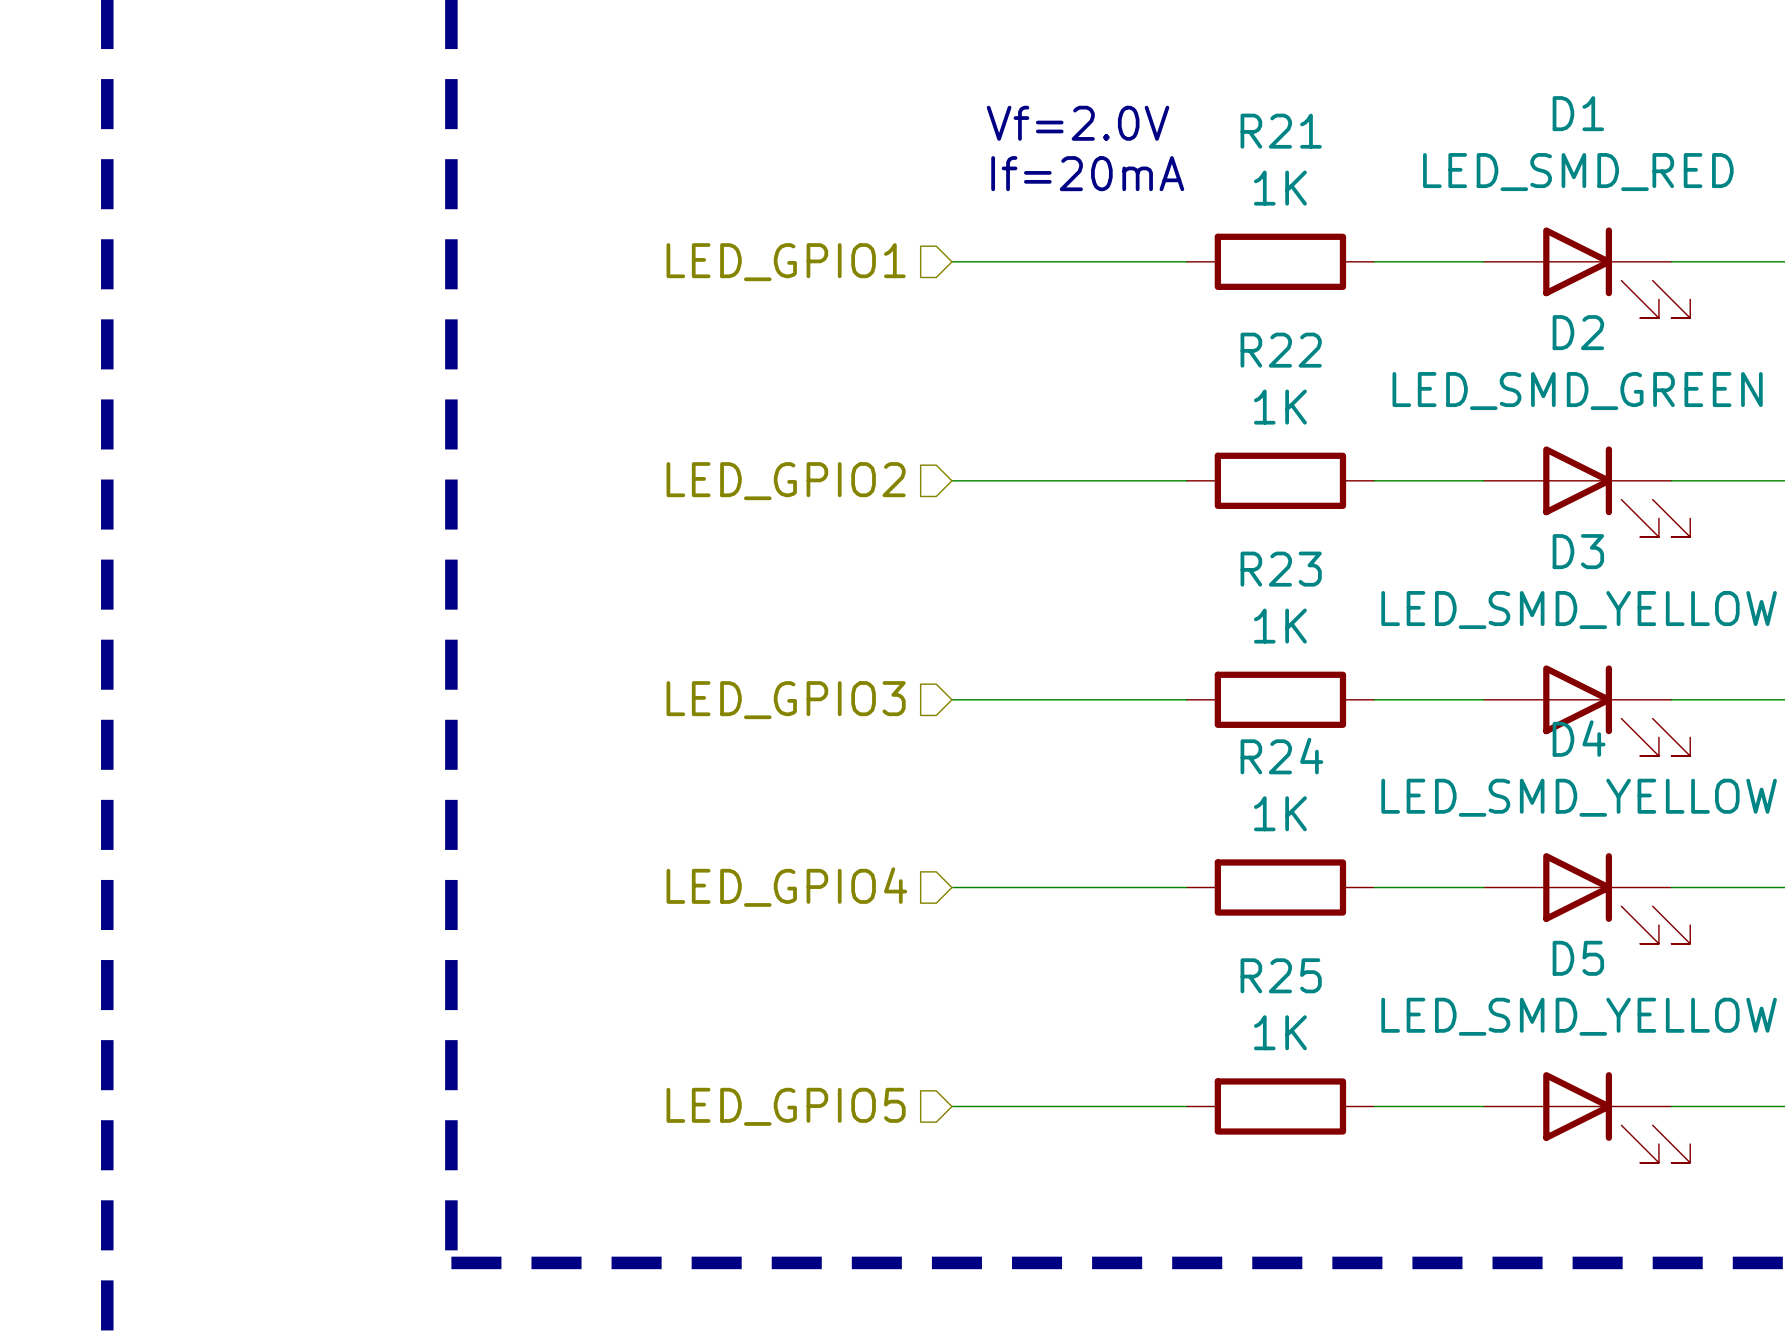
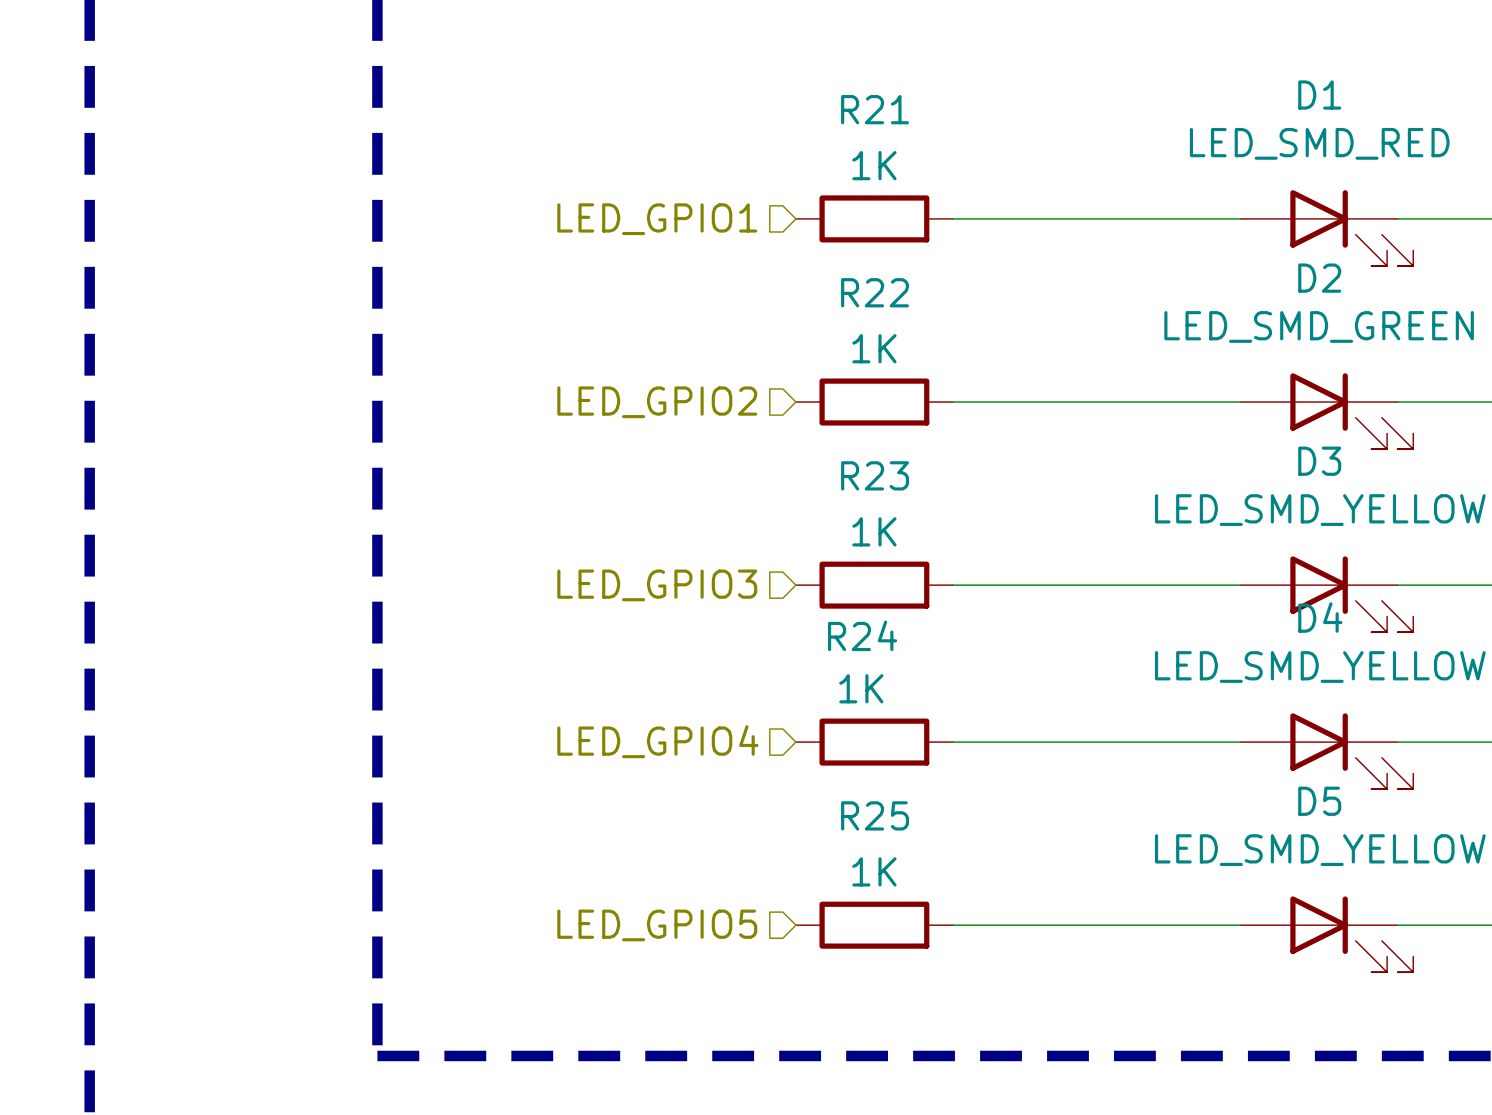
text: Vf=2.0V (1078, 123) -> none
text: If=20mA (1087, 173) -> none
R21 value position: 1K (1280, 188) -> 1K (874, 165)
wire: (951, 261) (1139, 261) -> (992, 218) (1149, 218)
R21 position: (1280, 261) -> (874, 218)
R22 value position: 1K (1280, 407) -> 1K (874, 348)
wire: (951, 480) (1139, 480) -> (992, 402) (1149, 402)
R22 position: (1280, 480) -> (874, 402)
R23 value position: 1K (1280, 626) -> 1K (874, 531)
wire: (951, 699) (1139, 699) -> (992, 585) (1149, 585)
R23 position: (1280, 699) -> (874, 585)
R24 name position: R24 (1281, 756) -> R24 (862, 635)
R24 value position: 1K (1280, 813) -> 1K (861, 688)
wire: (951, 887) (1139, 887) -> (992, 742) (1149, 742)
R24 position: (1280, 887) -> (874, 742)
R25 value position: 1K (1280, 1032) -> 1K (874, 871)
wire: (951, 1106) (1139, 1106) -> (992, 925) (1149, 925)
R25 position: (1280, 1106) -> (874, 925)

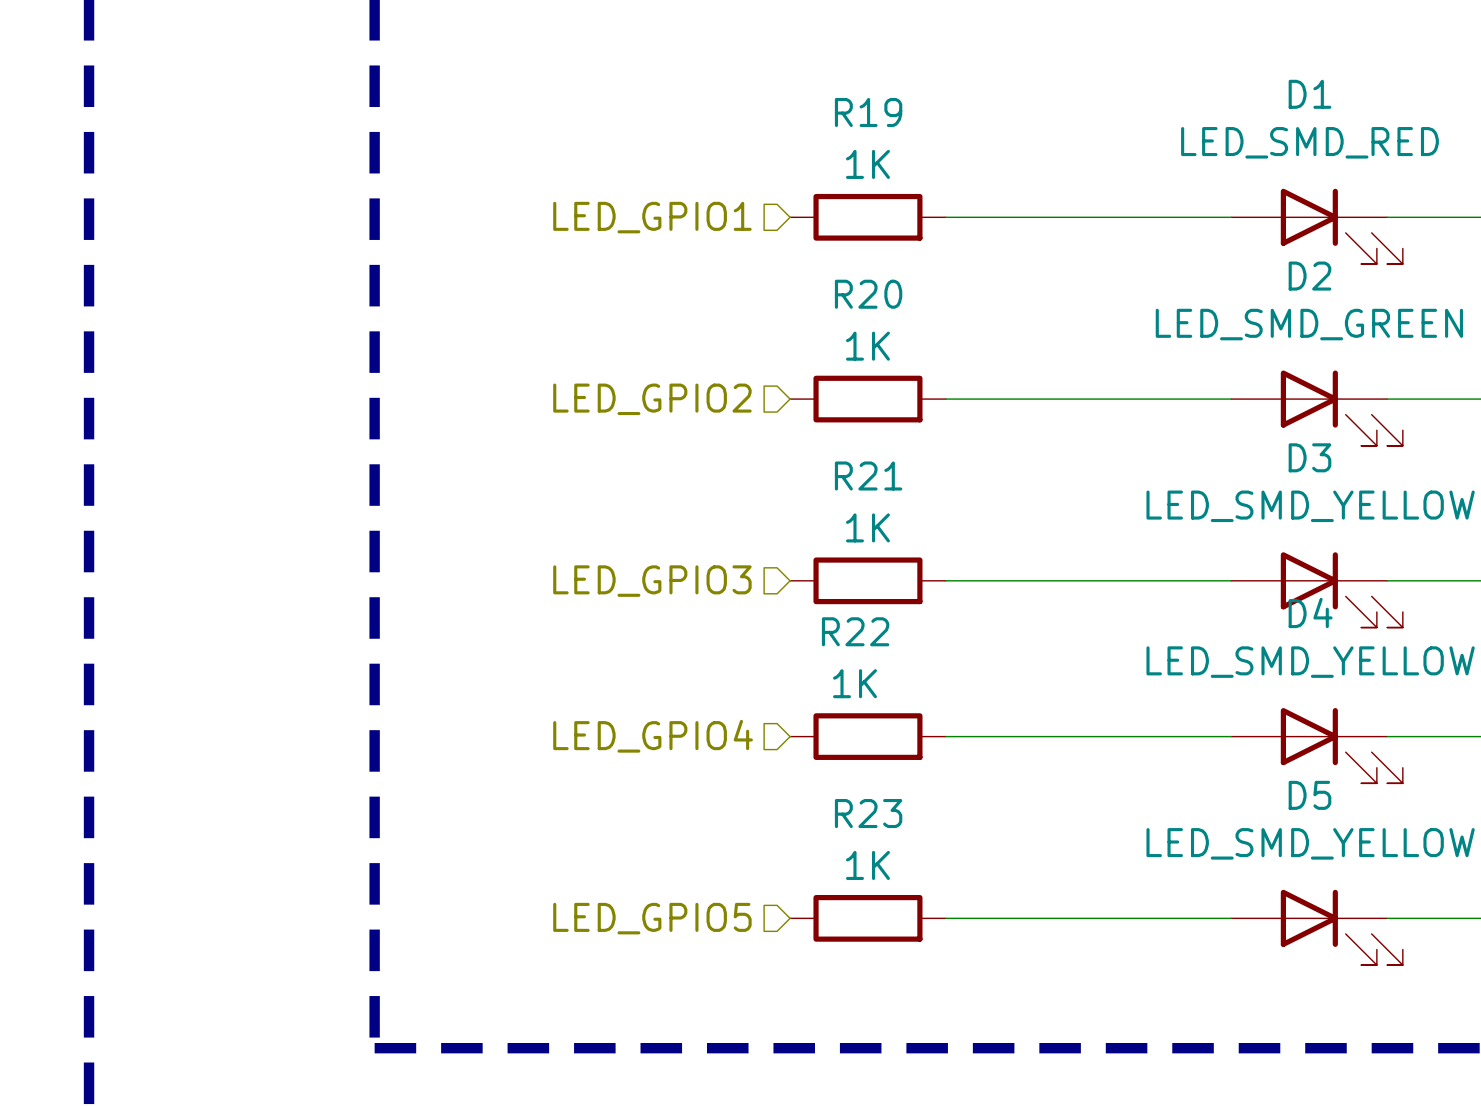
R21 name: R21 (875, 109) -> R19 (868, 112)
R22 name: R22 (875, 292) -> R20 (868, 294)
R23 name: R23 (875, 475) -> R21 (868, 475)
R24 name: R24 (862, 635) -> R22 (855, 631)
R25 name: R25 (875, 815) -> R23 (868, 813)

